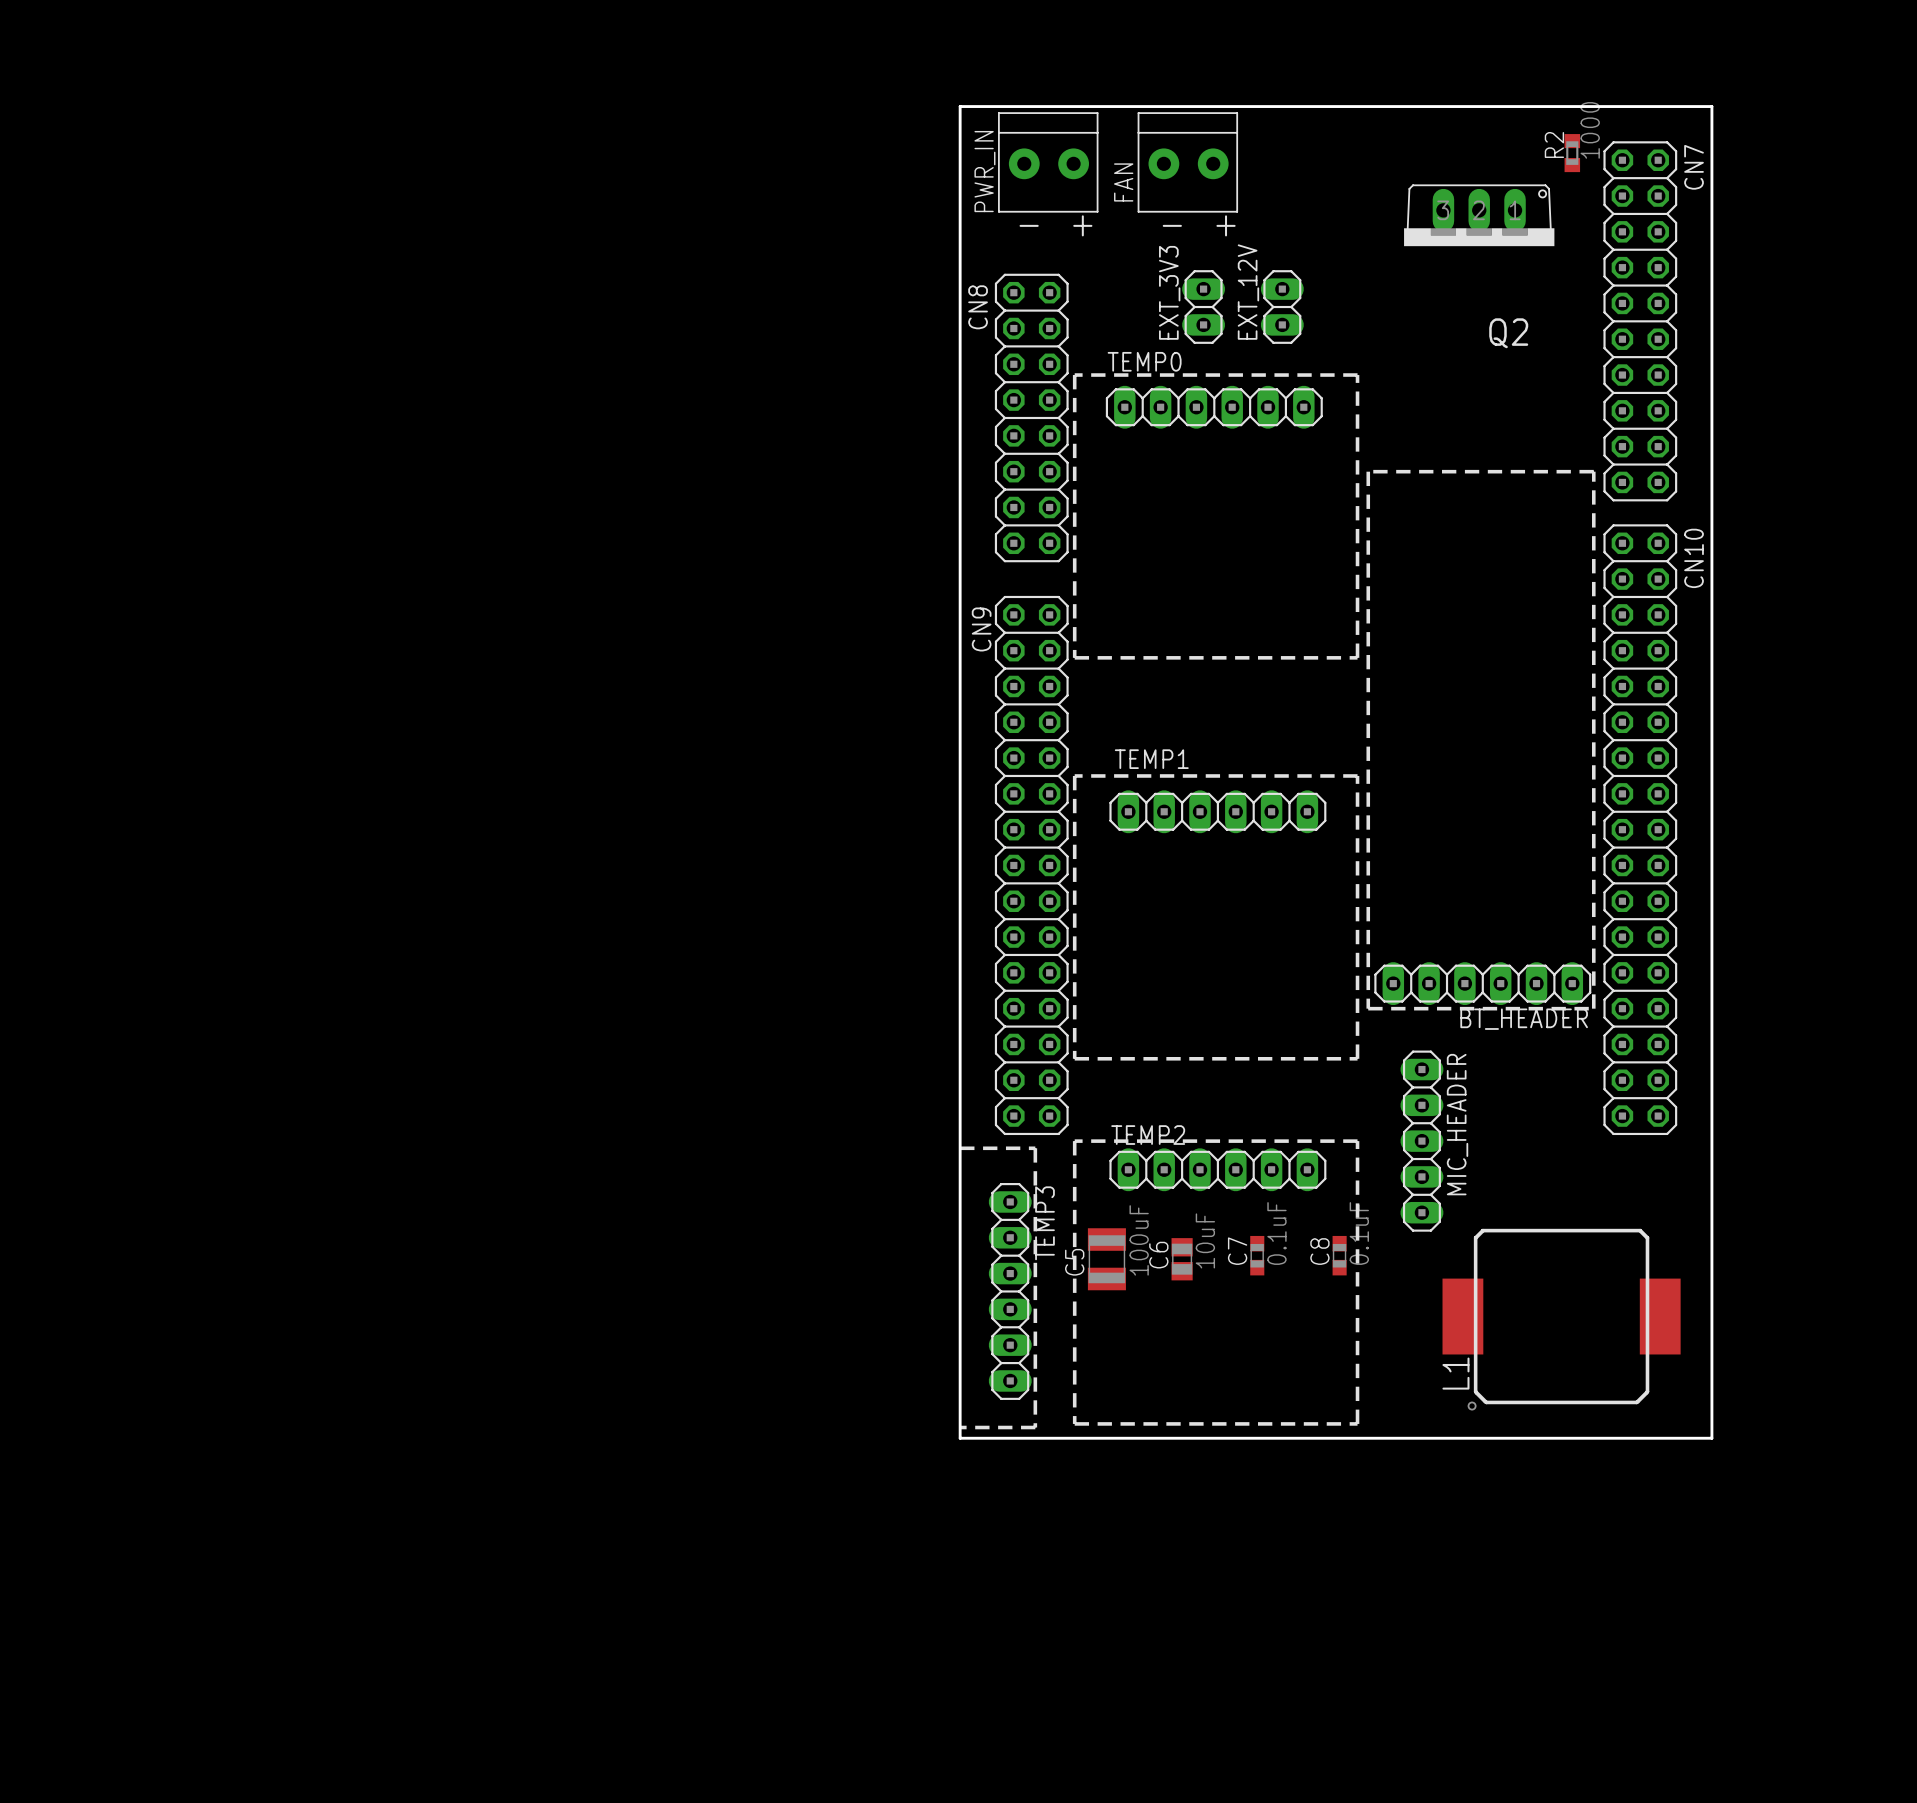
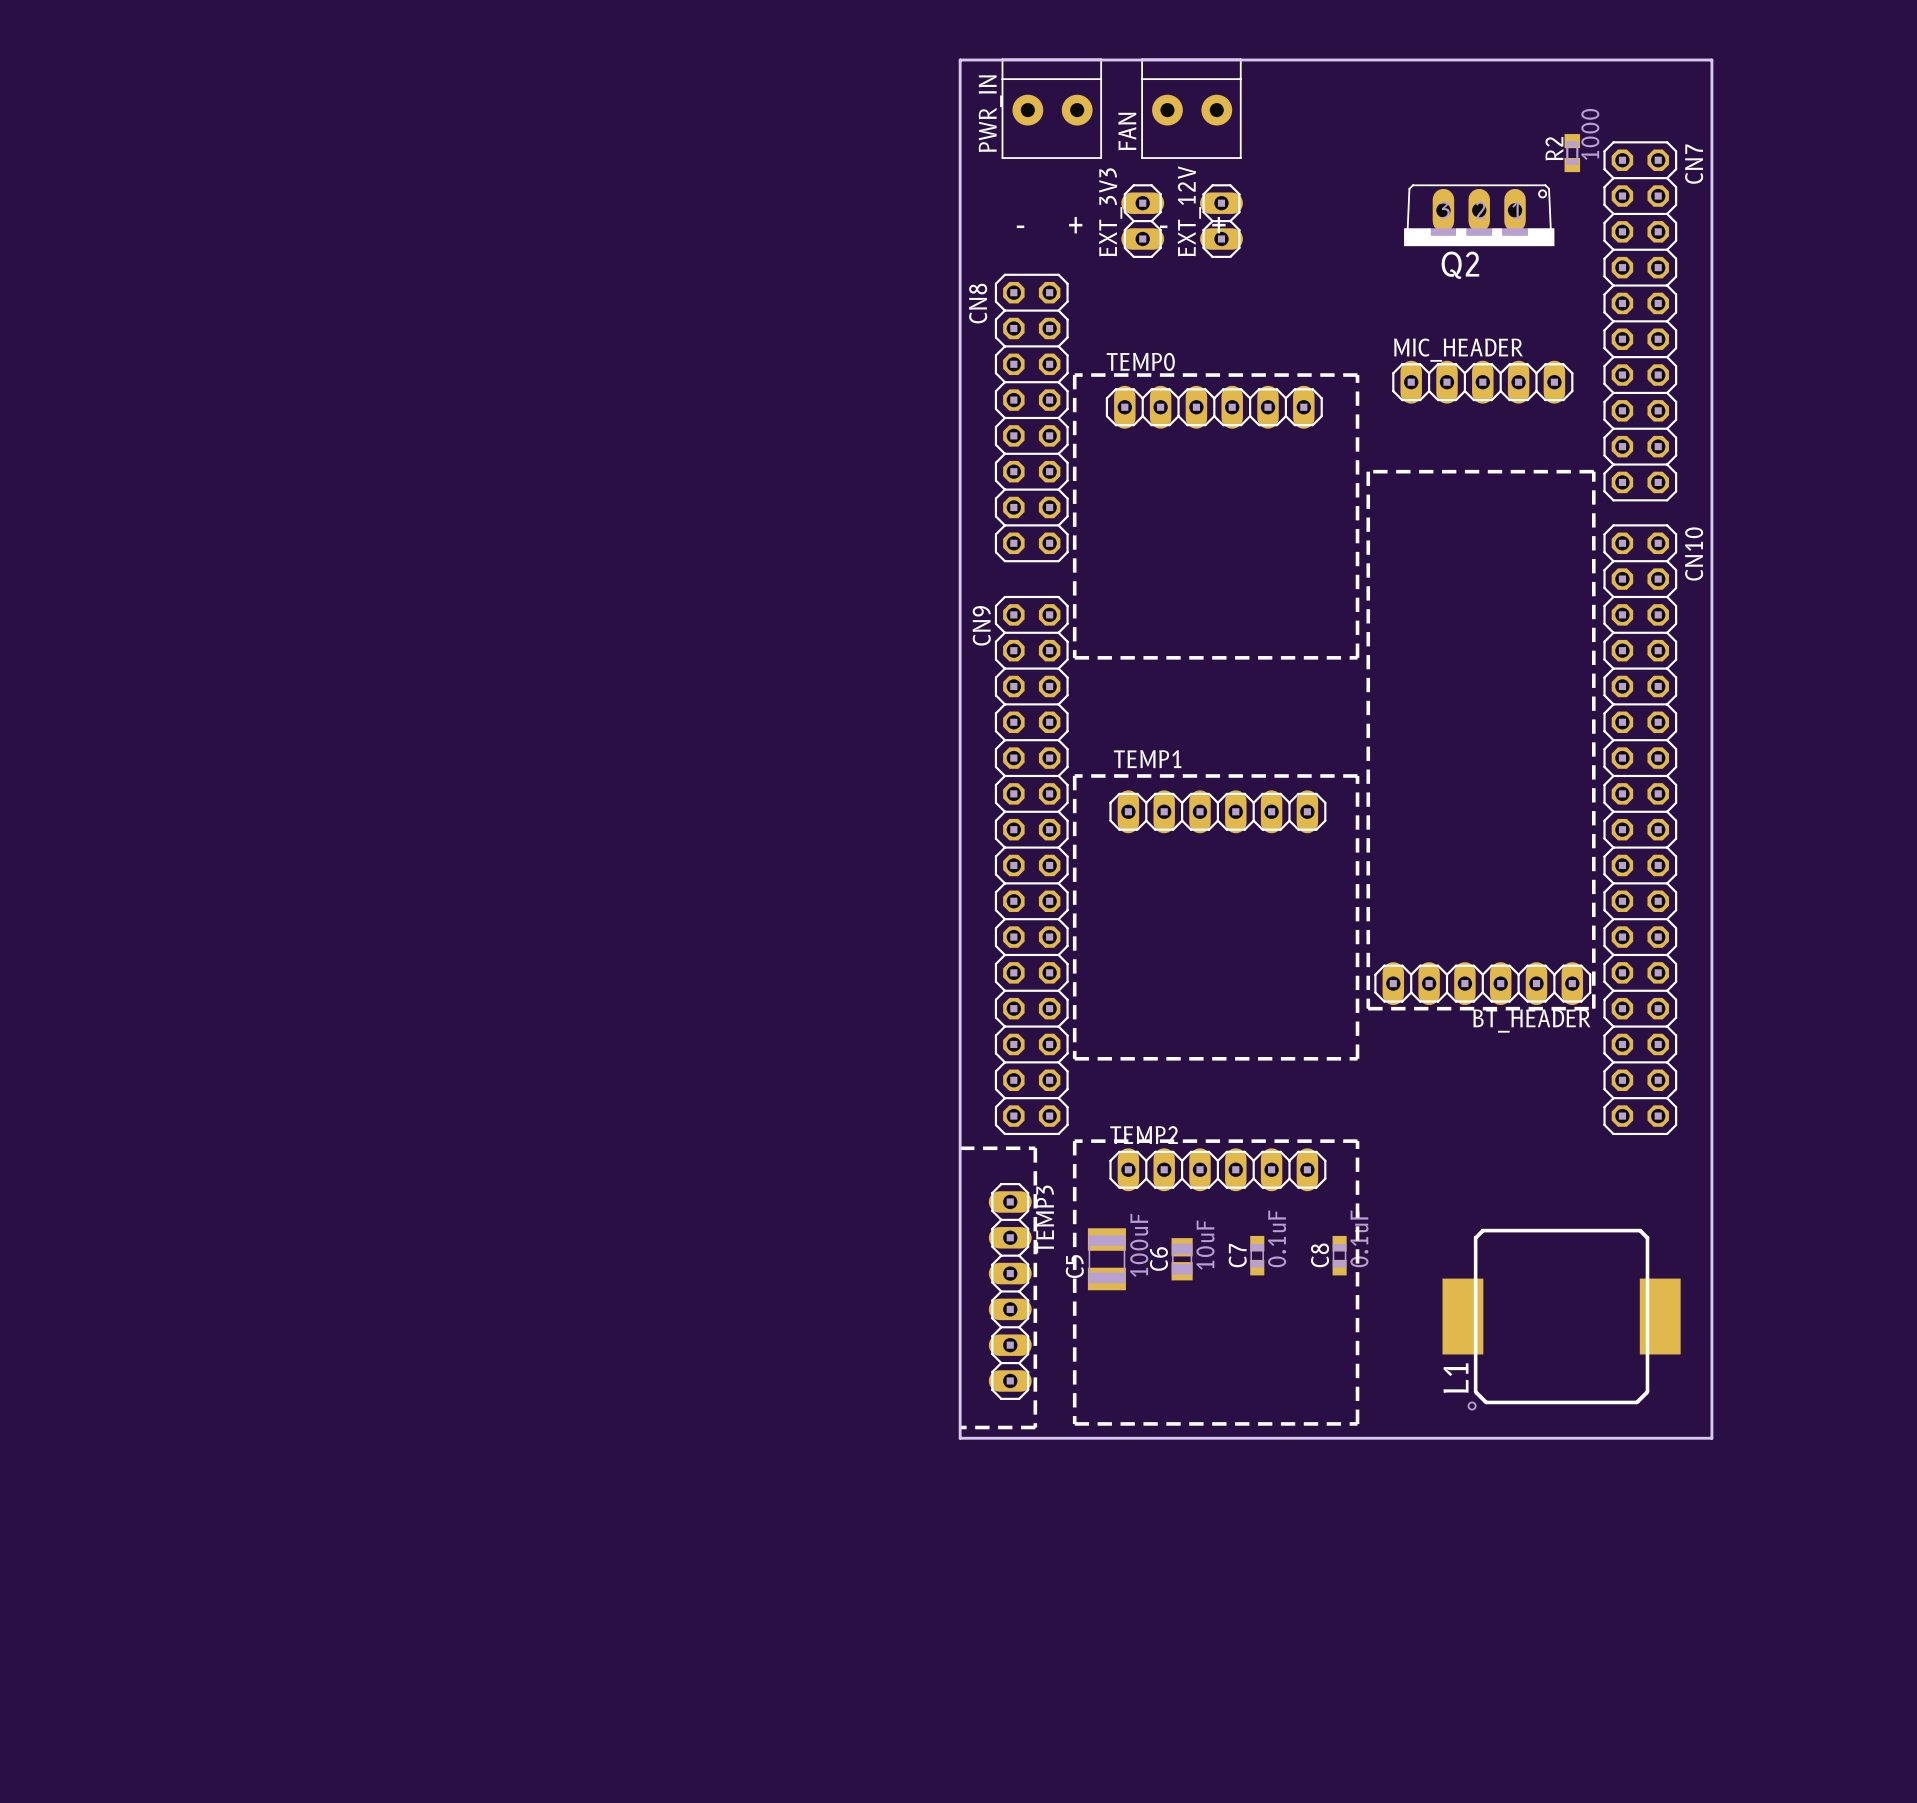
board edge: (960, 106) (1711, 106) -> (960, 106) (960, 60) (1711, 60) (1711, 106)
PWR_IN position: (1048, 162) -> (1051, 108)
FAN position: (1187, 162) -> (1191, 108)
EXT_3V3 position: (1203, 307) -> (1142, 221)
EXT_12V position: (1282, 307) -> (1221, 221)
Q2 name position: Q2 (1508, 333) -> Q2 (1460, 265)
MIC_HEADER: none -> (1482, 382)
MIC_HEADER: (1421, 1141) -> none

